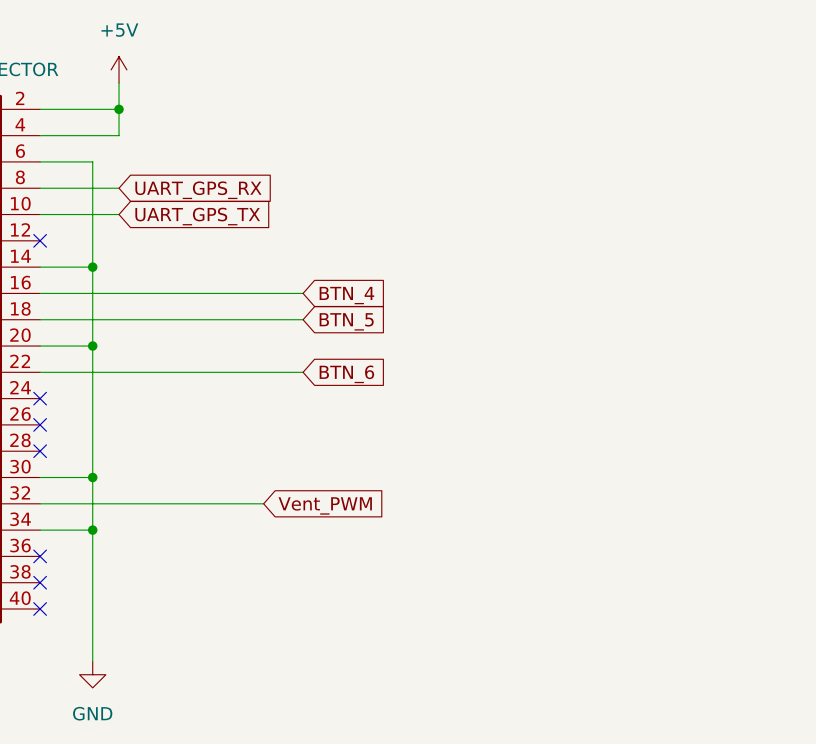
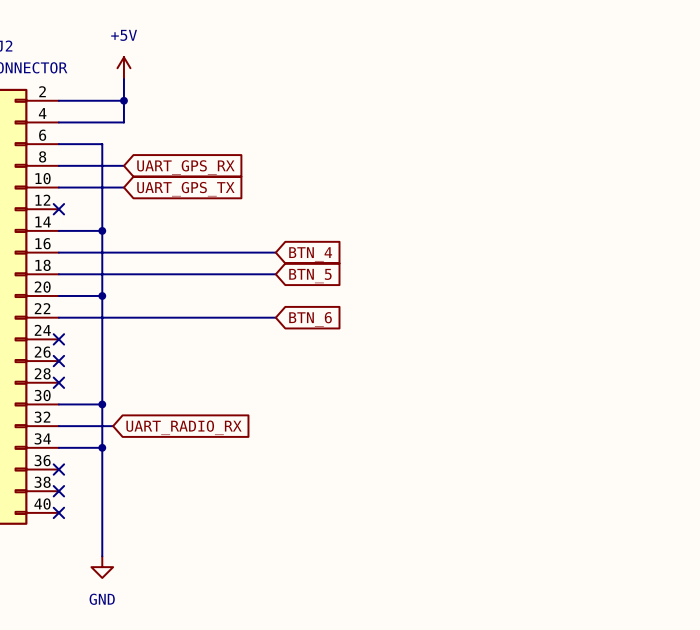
wire: (105, 503) (263, 503) -> none
global label: none -> UART_RADIO_RX (184, 427)
global label: Vent_PWM (325, 505) -> none

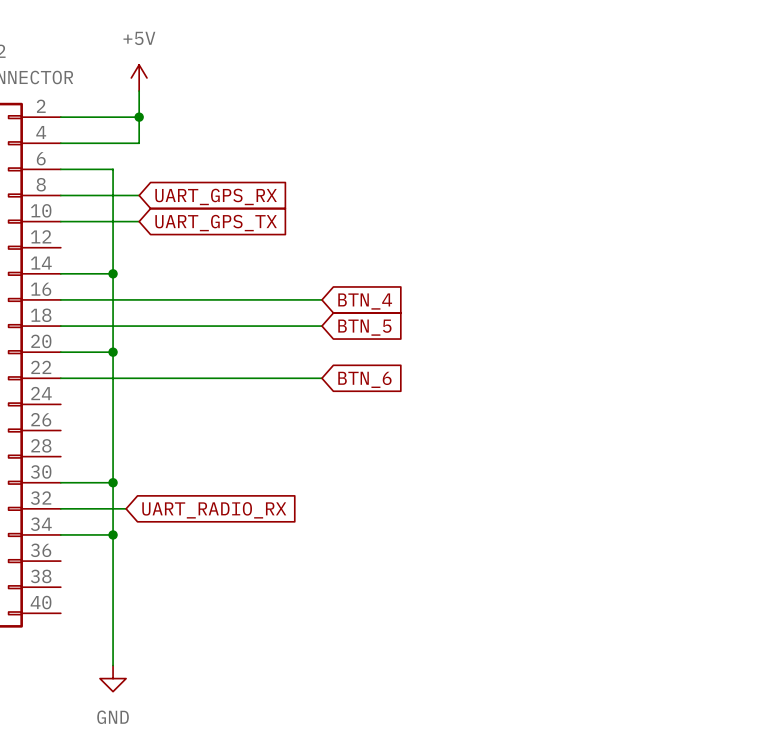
no-connect mark: (58, 209) -> none
no-connect mark: (58, 339) -> none
no-connect mark: (58, 361) -> none
no-connect mark: (58, 382) -> none
no-connect mark: (58, 469) -> none
no-connect mark: (58, 491) -> none
no-connect mark: (58, 512) -> none

